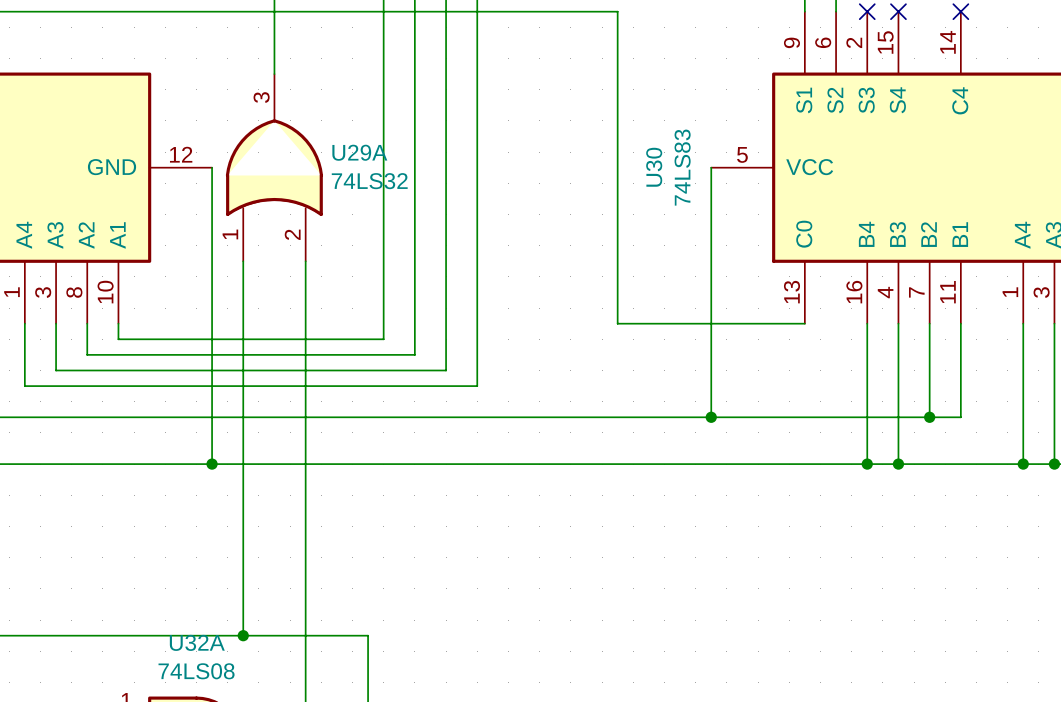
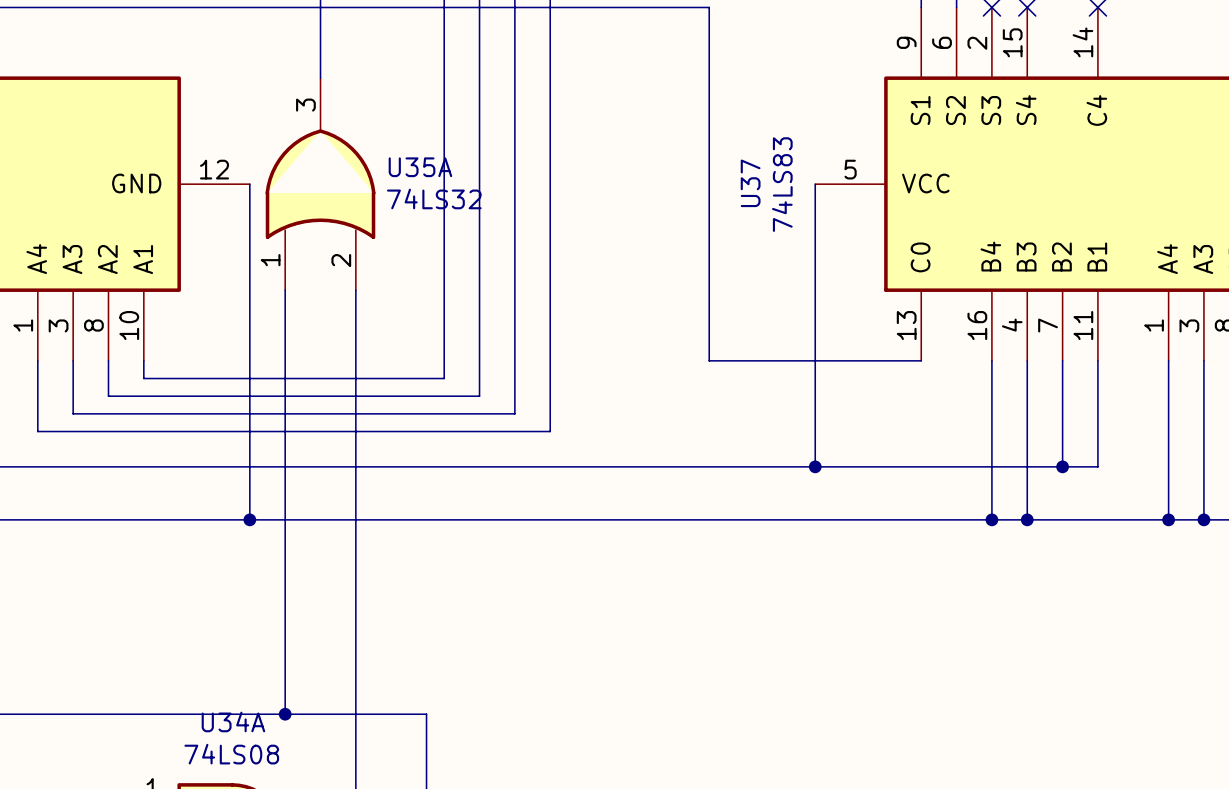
U29A name: U29A (359, 152) -> U35A (420, 167)
U30 name: U30 (654, 167) -> U37 (750, 183)
U32A name: U32A (197, 642) -> U34A (233, 721)

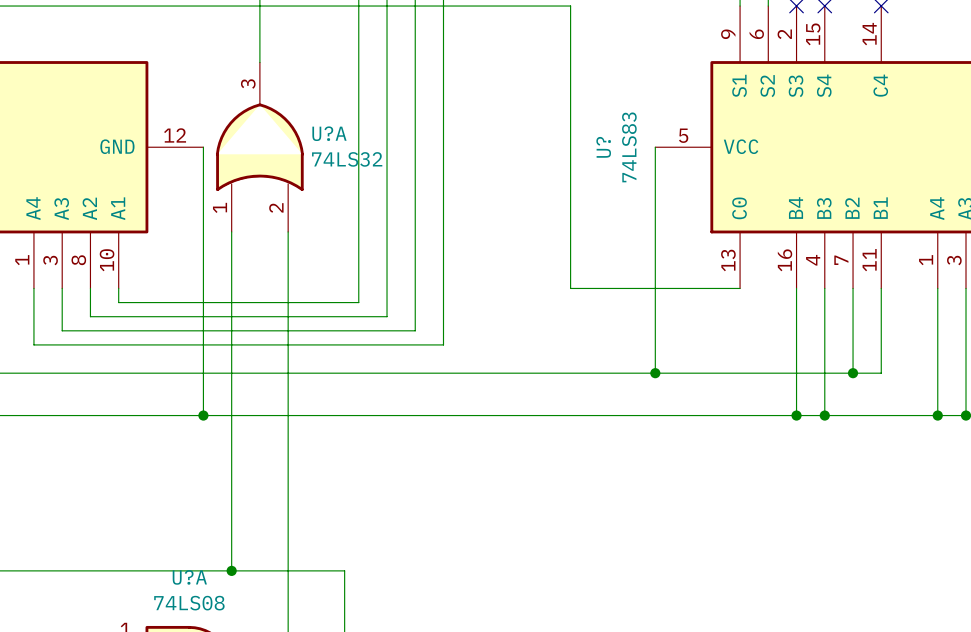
U35A name: U35A (420, 167) -> U?A (329, 133)
U37 name: U37 (750, 183) -> U? (603, 147)
U34A name: U34A (233, 721) -> U?A (189, 577)

